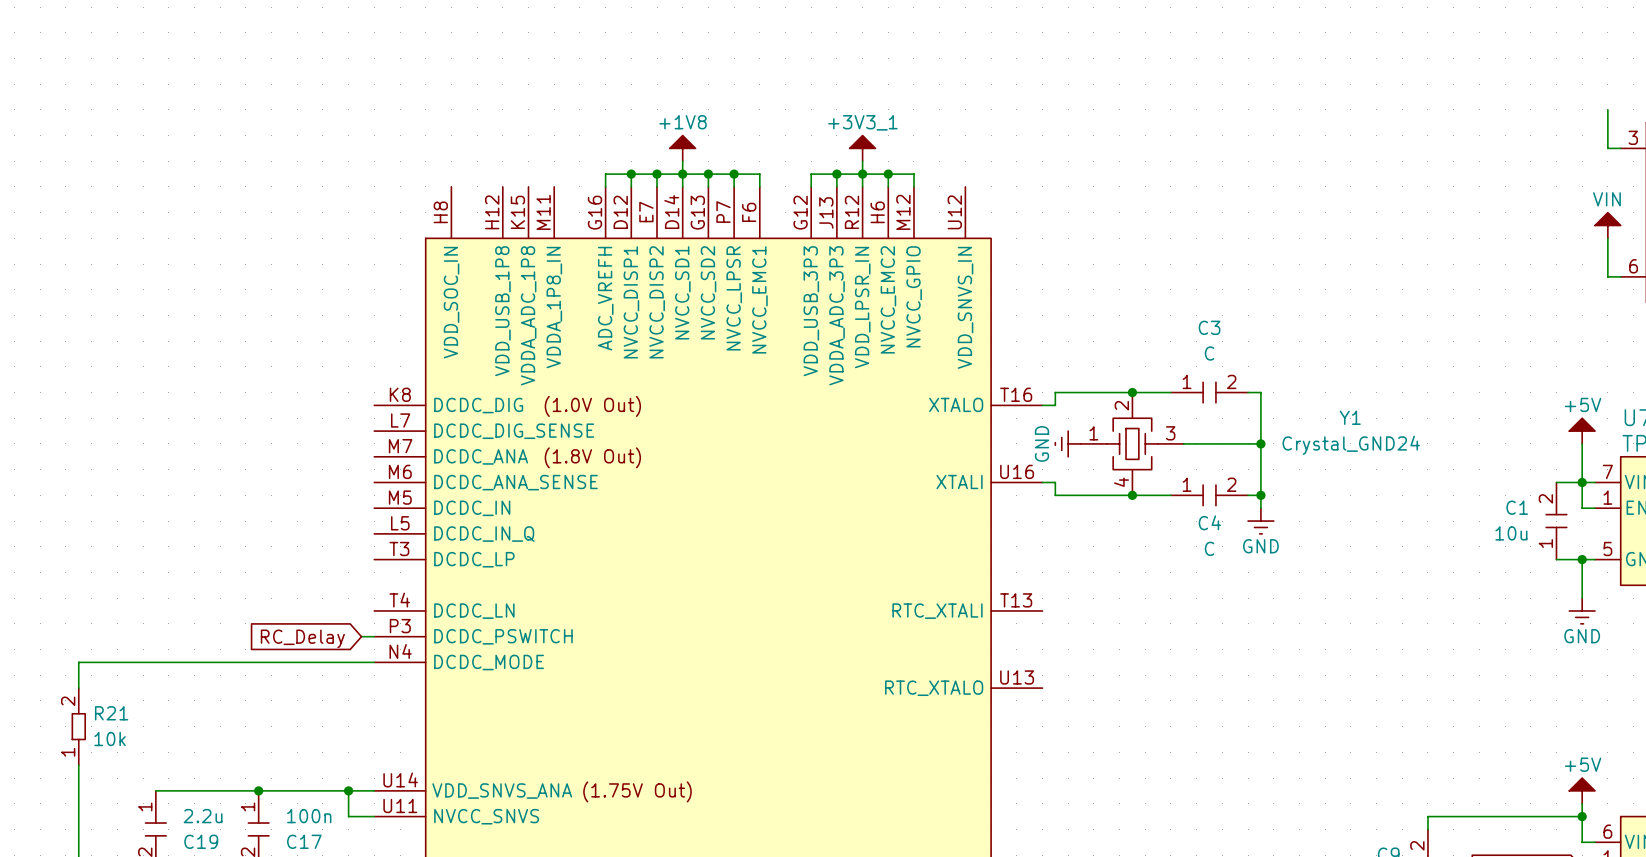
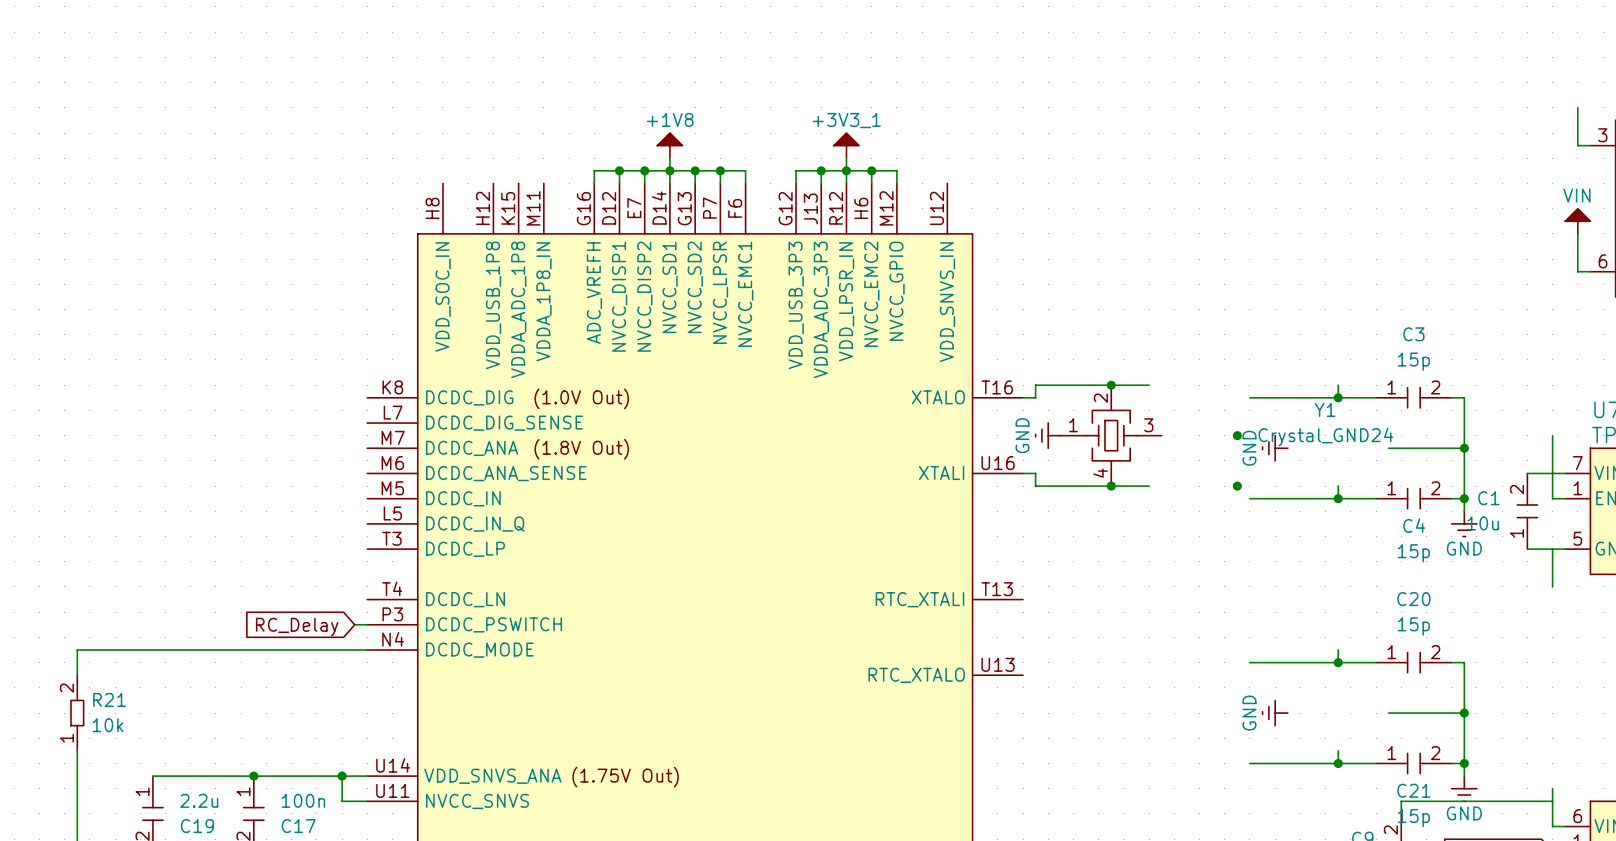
C3 value: C (1209, 353) -> 15p (1413, 361)
C3 position: (1209, 392) -> (1413, 397)
wire: (1248, 392) (1260, 392) (1260, 508) -> (1451, 397) (1464, 397) (1464, 511)
wire: none -> (1338, 385) (1338, 397)
wire: none -> (1249, 397) (1376, 397)
junction: none -> (1338, 397)
power symbol: +5V (1582, 431) -> none
wire: (1183, 443) (1260, 443) -> (1388, 448) (1464, 448)
junction: none -> (1464, 448)
junction: (1582, 482) -> none
C4 position: (1209, 495) -> (1413, 498)
wire: (1248, 495) (1260, 495) -> (1451, 498) (1464, 498)
wire: none -> (1338, 486) (1338, 498)
wire: none -> (1249, 498) (1376, 498)
junction: none -> (1338, 498)
junction: none -> (1464, 498)
power symbol rotation: 0° (1260, 521) -> 90° clockwise (1275, 448)
power symbol position: GND (1260, 521) -> GND (1275, 448)
power symbol: none -> GND (1464, 523)
C4 value: C (1209, 548) -> 15p (1413, 553)
junction: (1582, 559) -> none
power symbol: GND (1582, 610) -> none
wire: none -> (1338, 650) (1338, 662)
wire: none -> (1249, 662) (1376, 662)
junction: none -> (1338, 662)
C20: none -> 15p (1413, 662)
wire: none -> (1451, 662) (1464, 662) (1464, 776)
power symbol: none -> GND (1275, 713)
wire: none -> (1388, 713) (1464, 713)
junction: none -> (1464, 713)
wire: none -> (1338, 750) (1338, 763)
wire: none -> (1249, 763) (1376, 763)
junction: none -> (1338, 763)
C21: none -> 15p (1413, 763)
wire: none -> (1451, 763) (1464, 763)
junction: none -> (1464, 763)
power symbol: +5V (1582, 790) -> none
power symbol: none -> GND (1464, 788)
junction: (1582, 816) -> none

